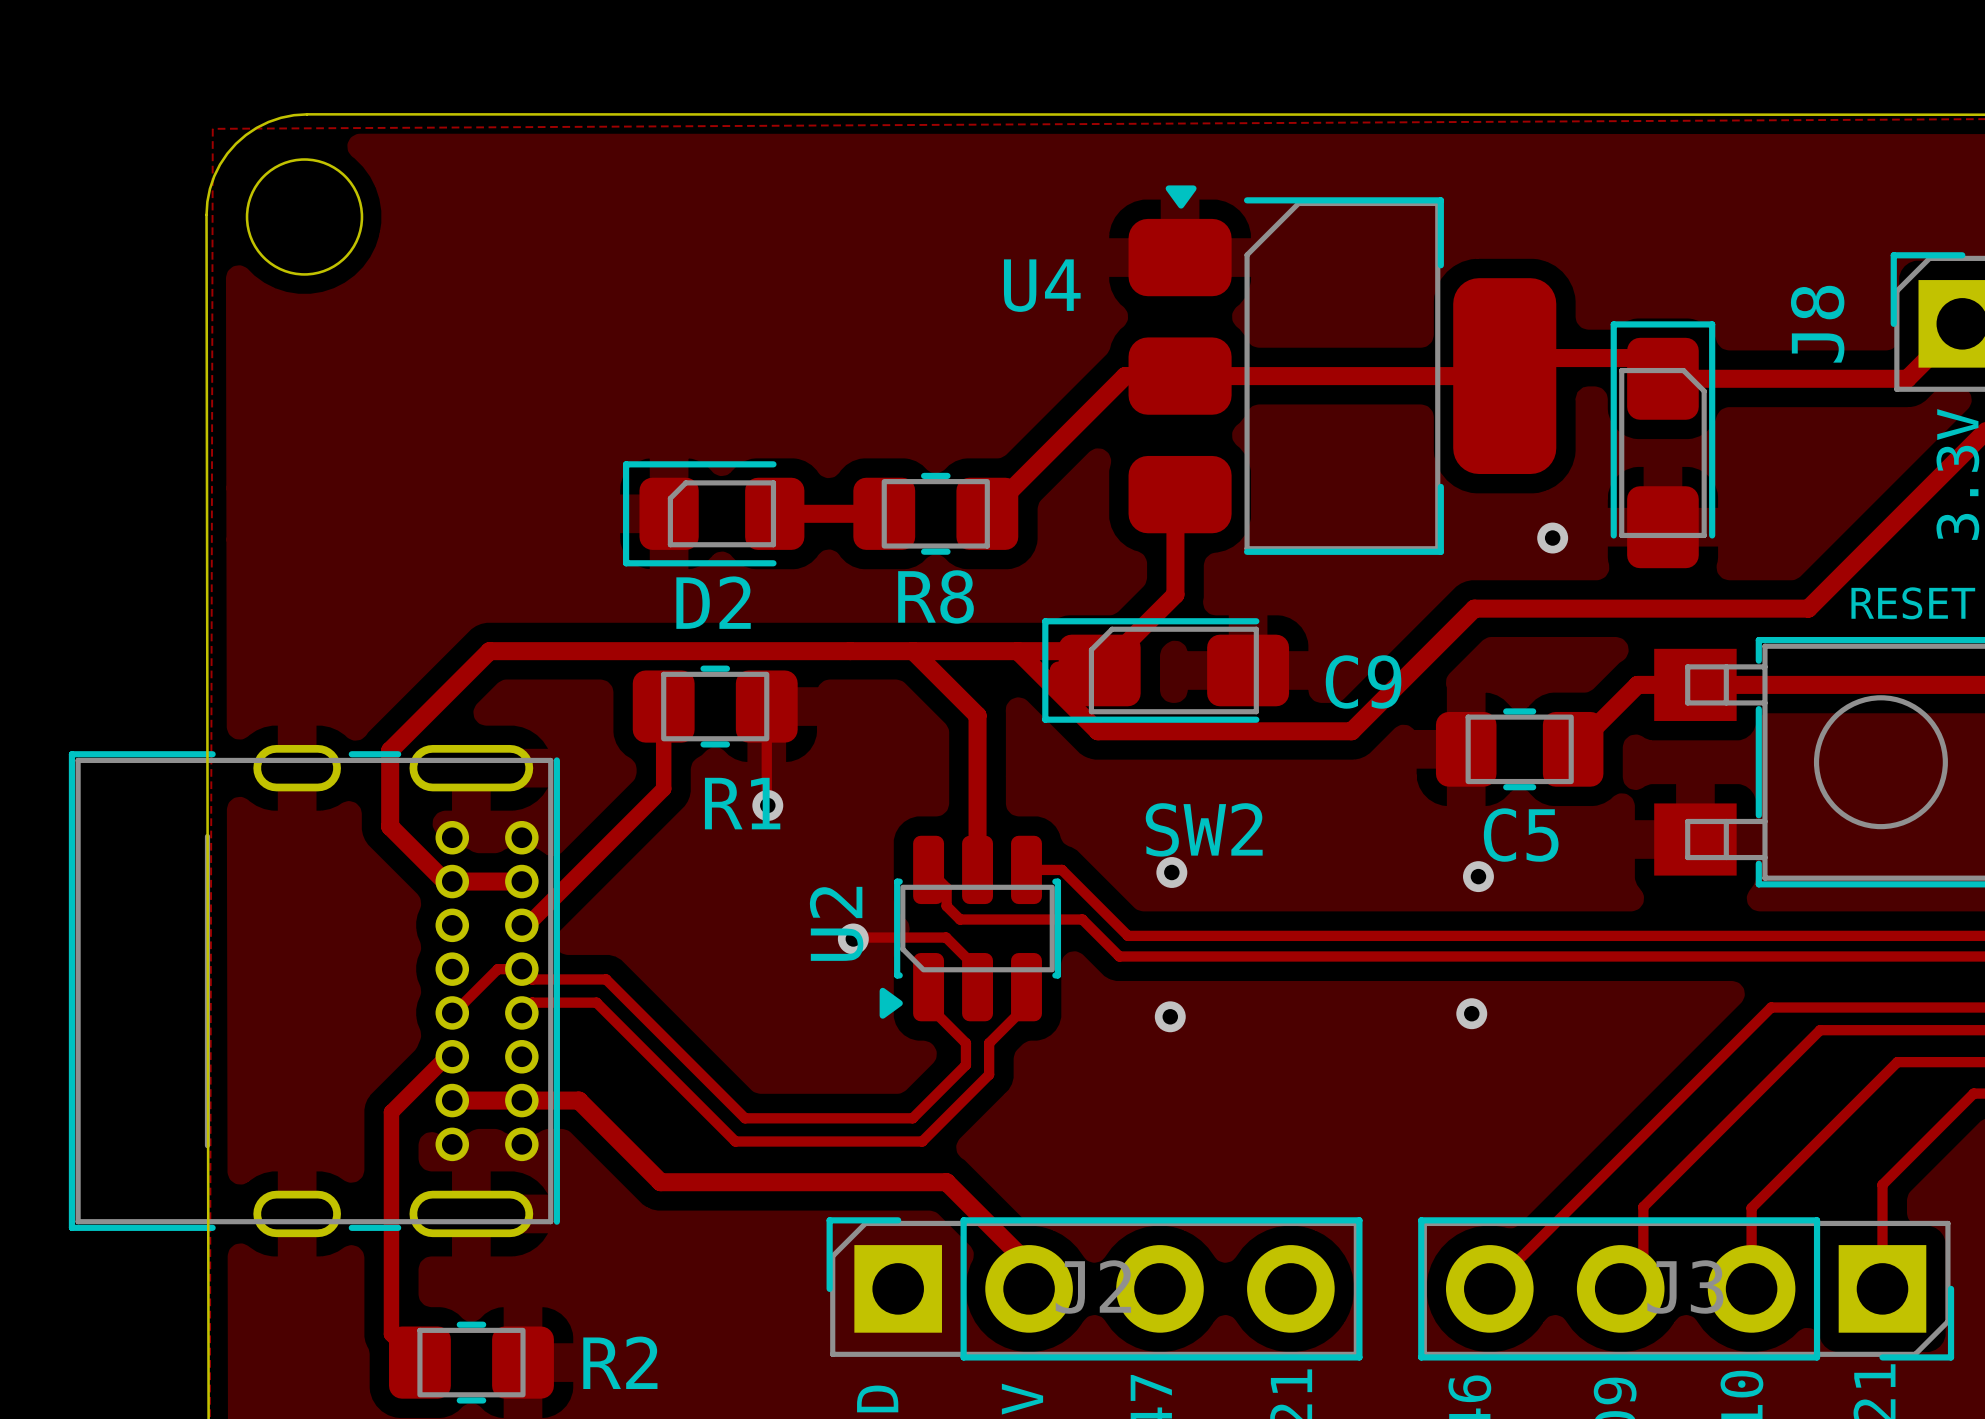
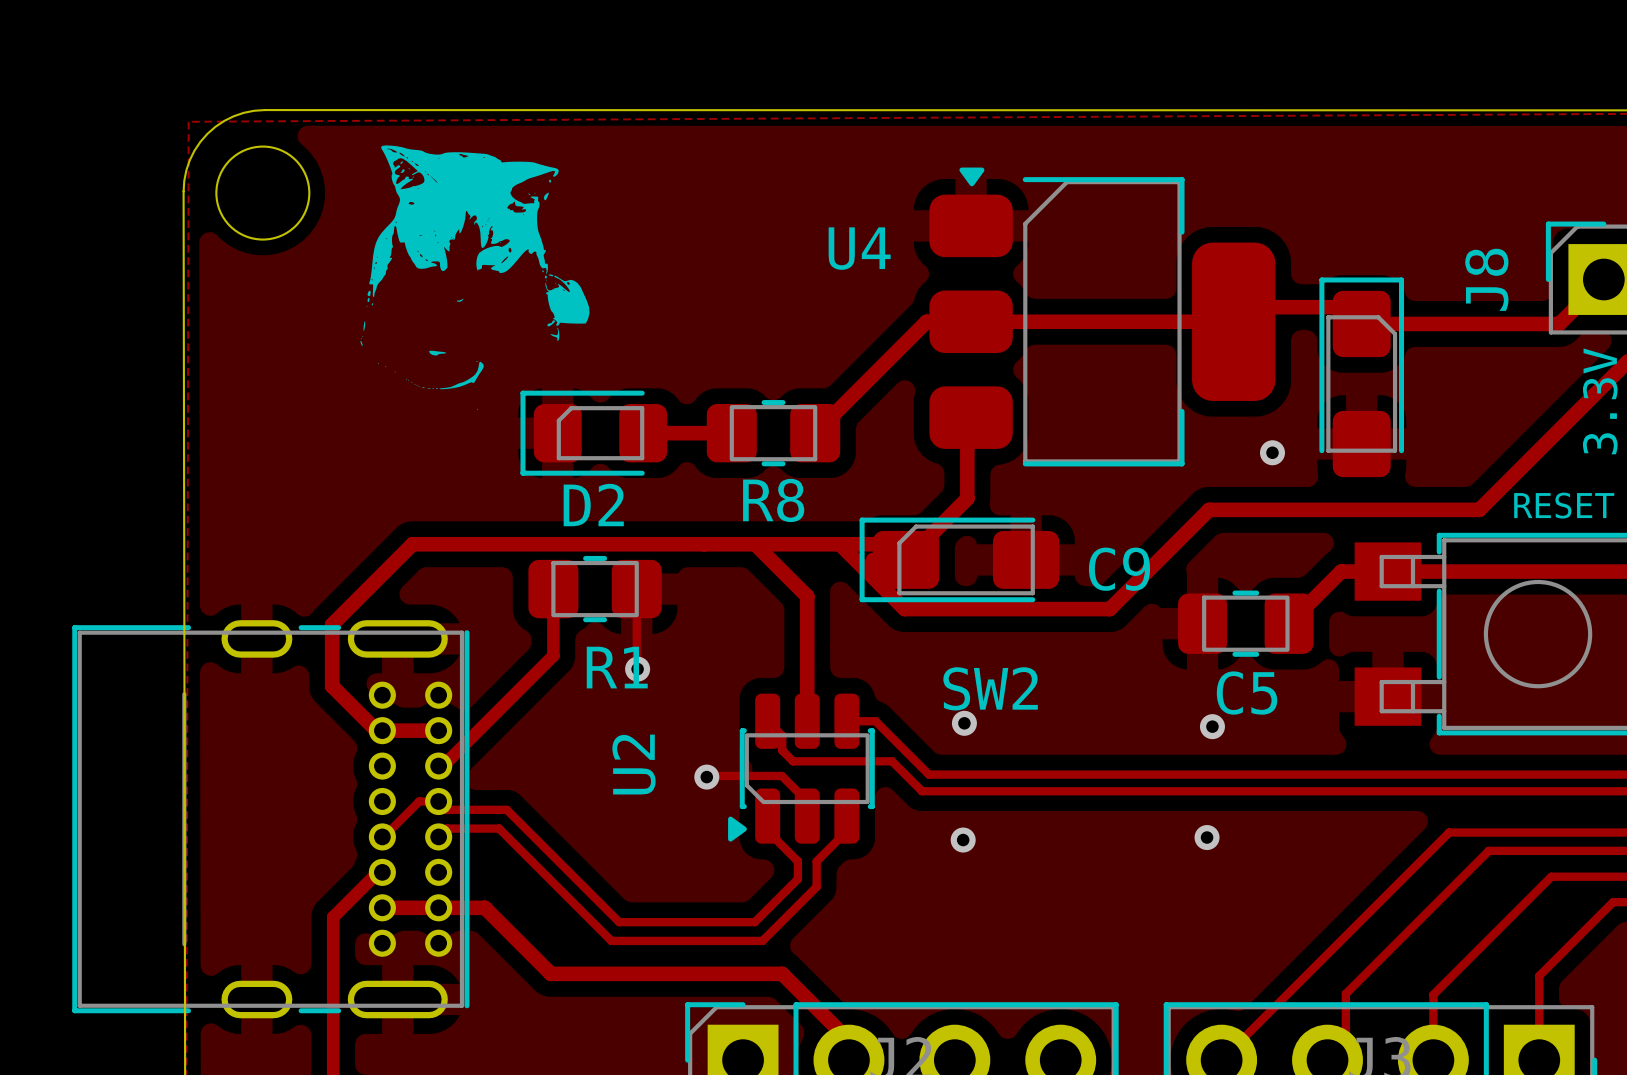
drawing: none -> [360, 145, 590, 410]
U2 name position: U2 (836, 923) -> U2 (633, 764)

